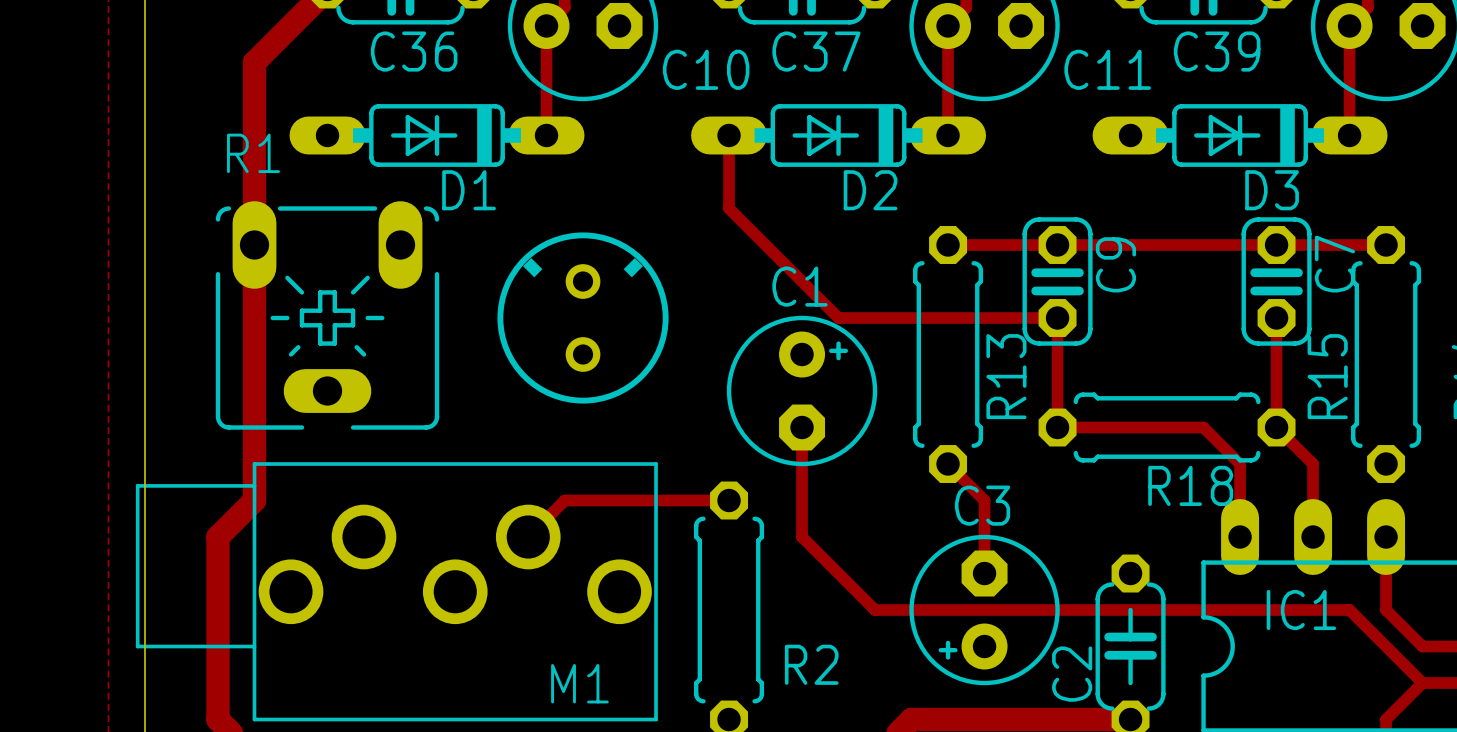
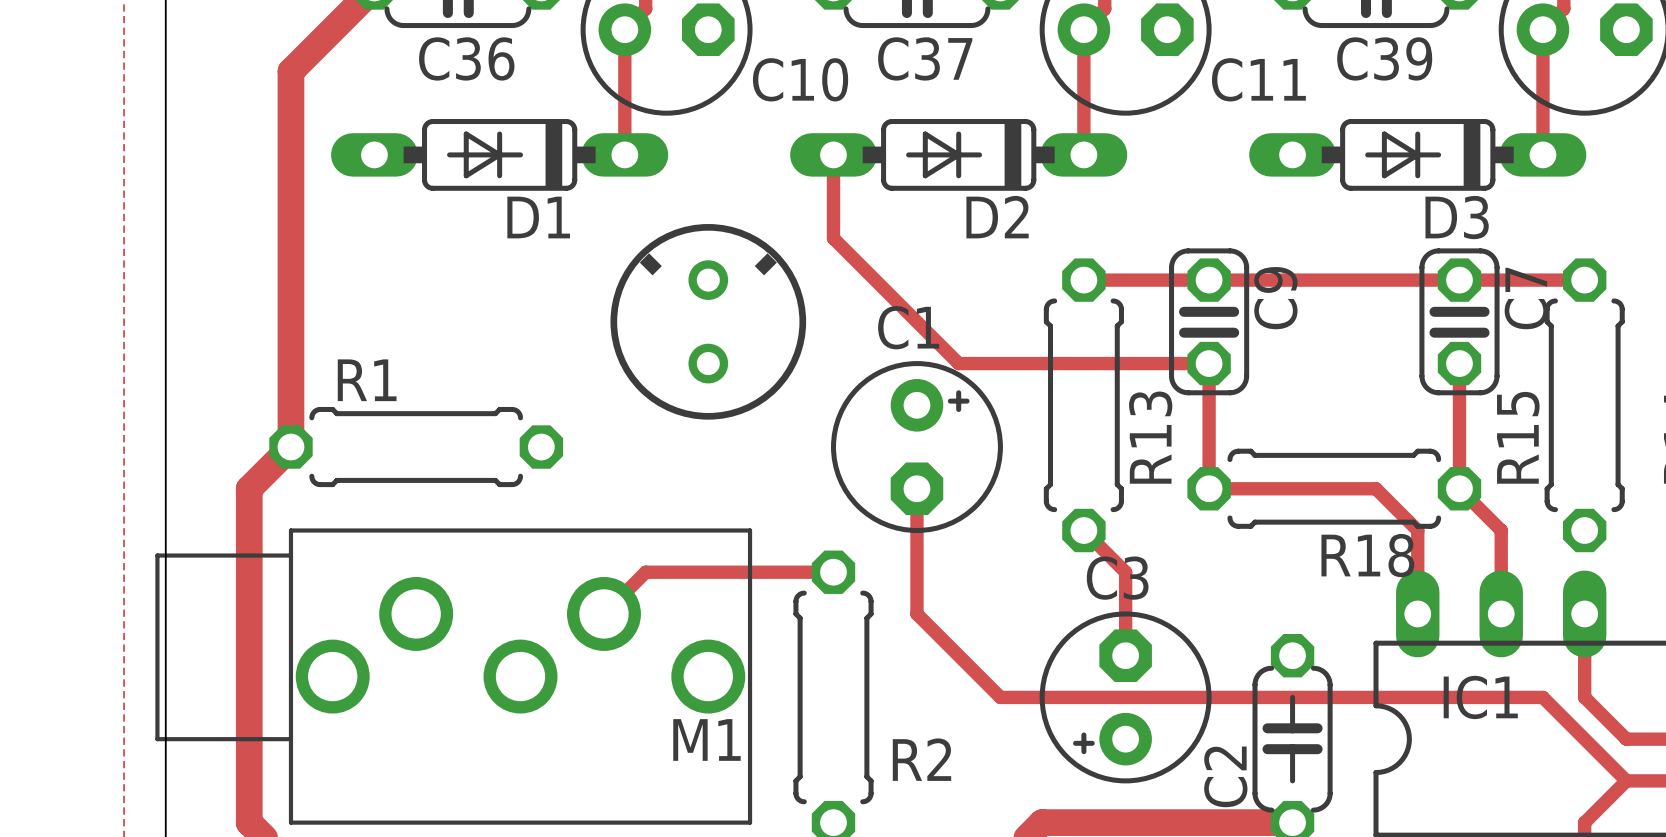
R1 name position: R1 (253, 153) -> R1 (367, 380)
R1 footprint: [215, 201, 440, 430] -> [269, 406, 564, 488]
M1 position: (583, 318) -> (708, 321)
track: (254, 391) (254, 500) (218, 537) -> (290, 447) (249, 488) (249, 613)

